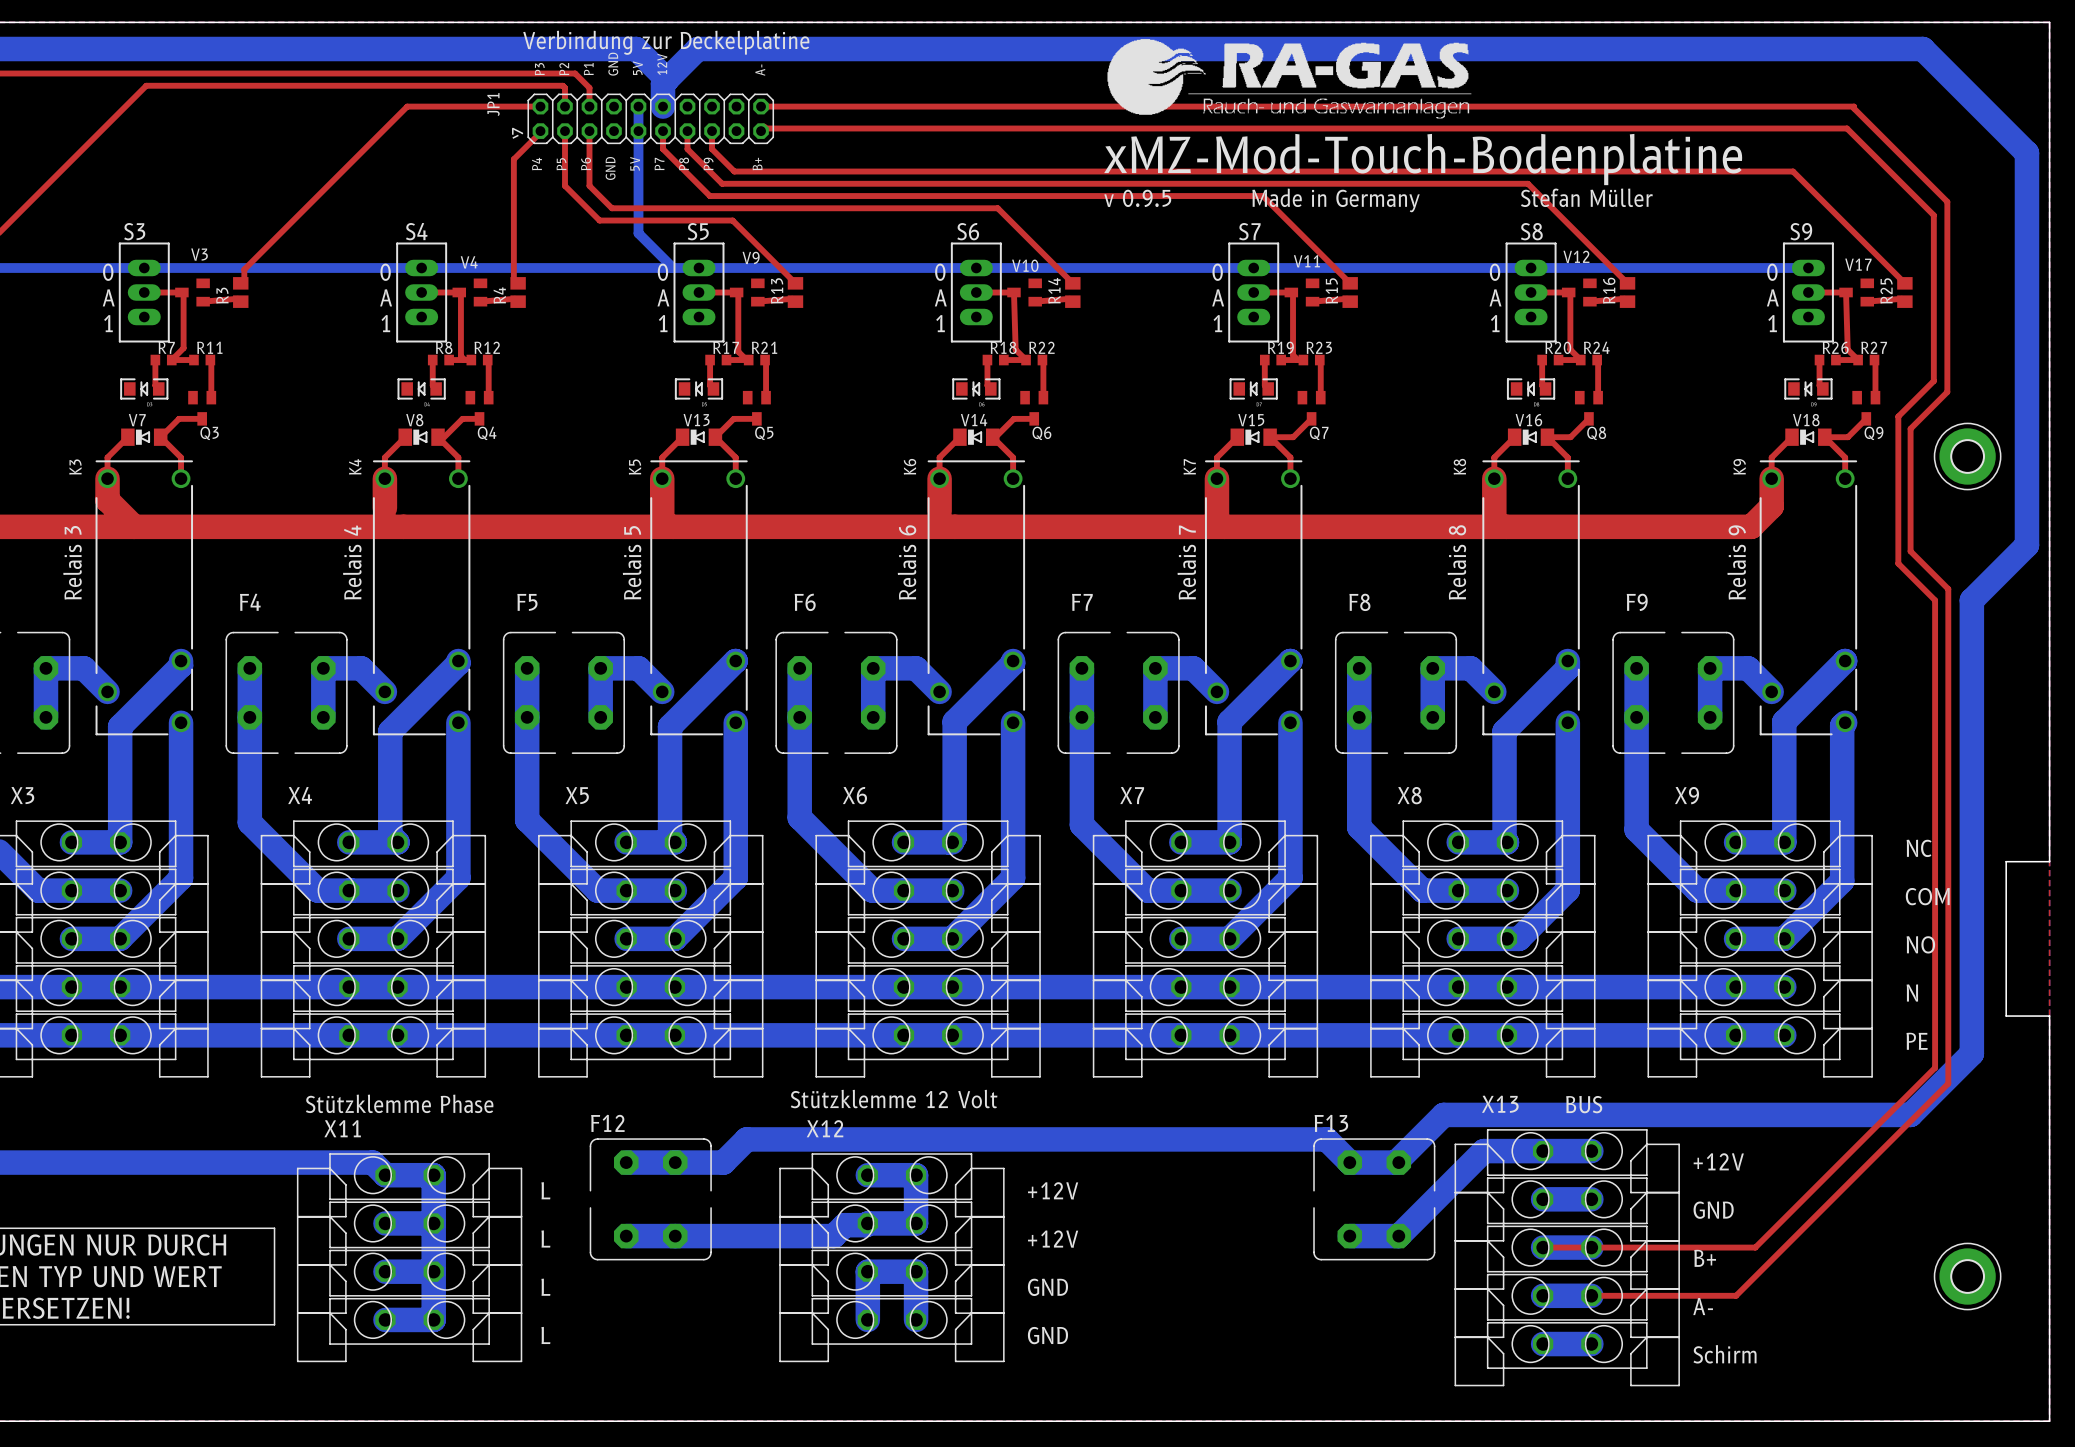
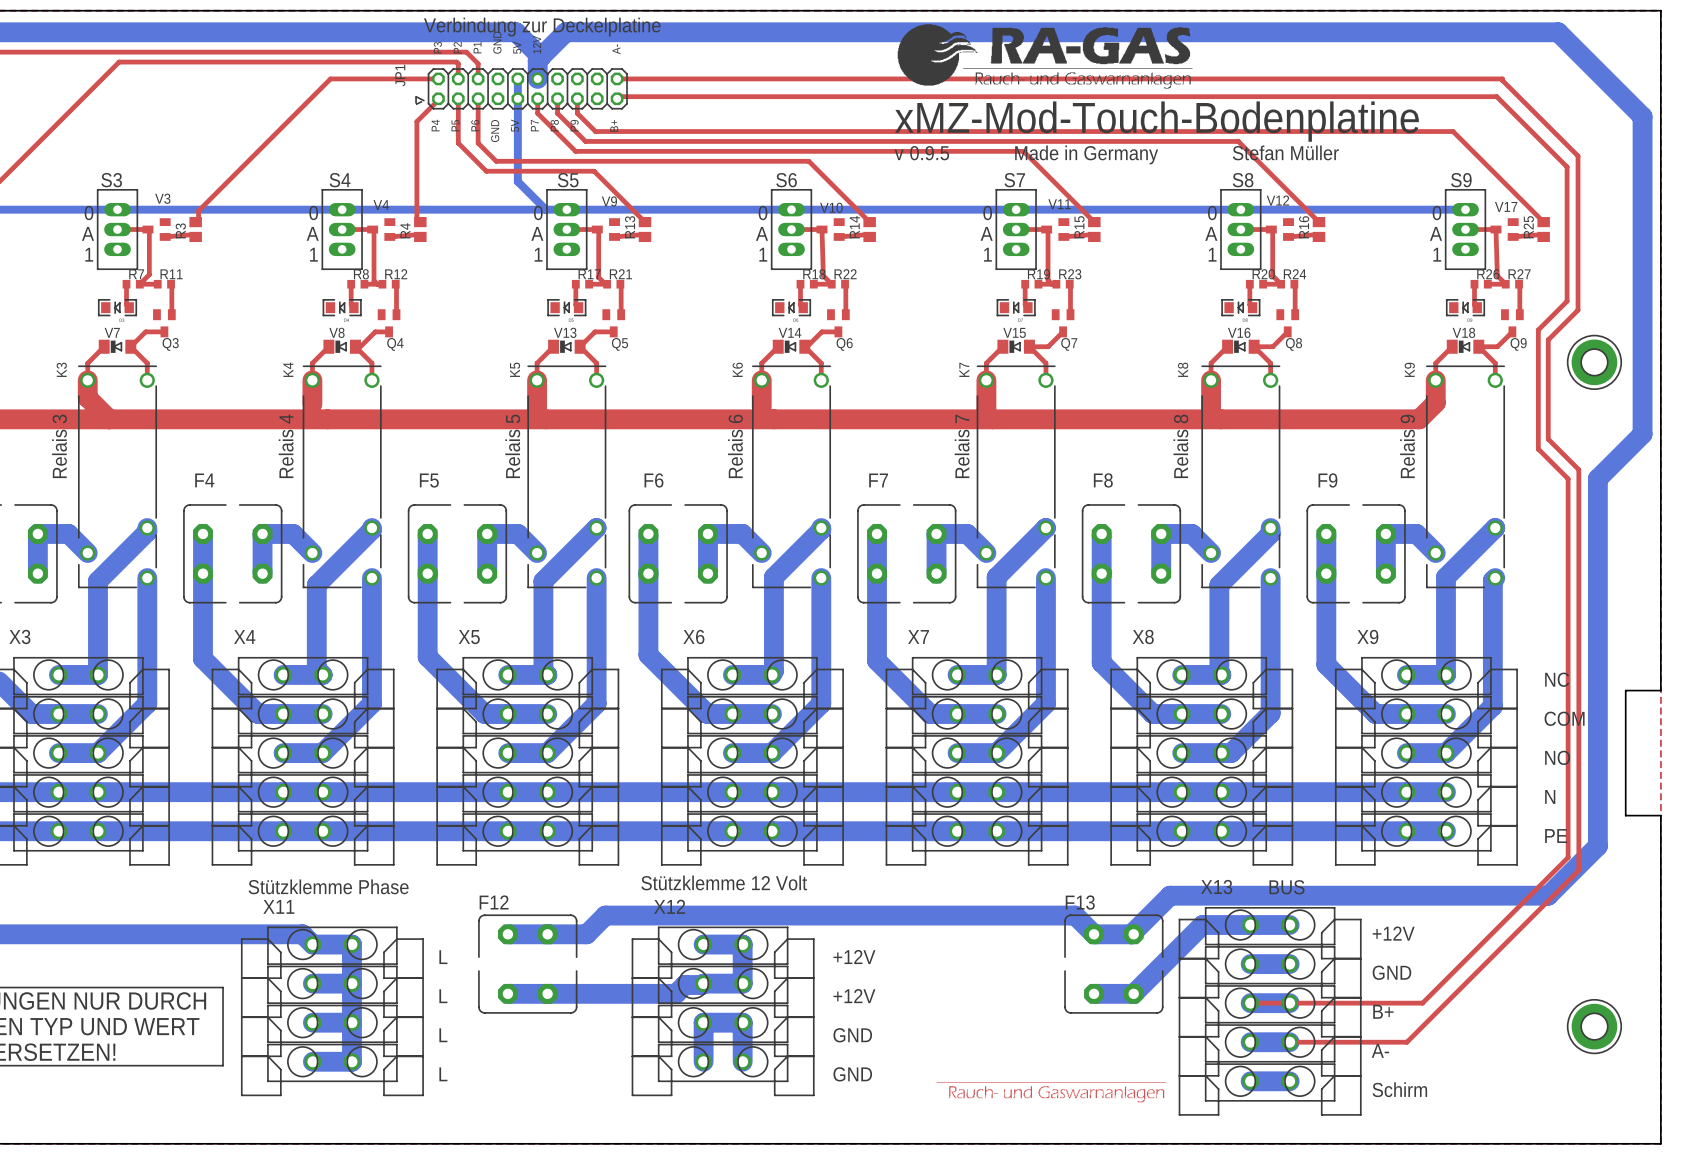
drawing: none -> [936, 1082, 1166, 1103]

